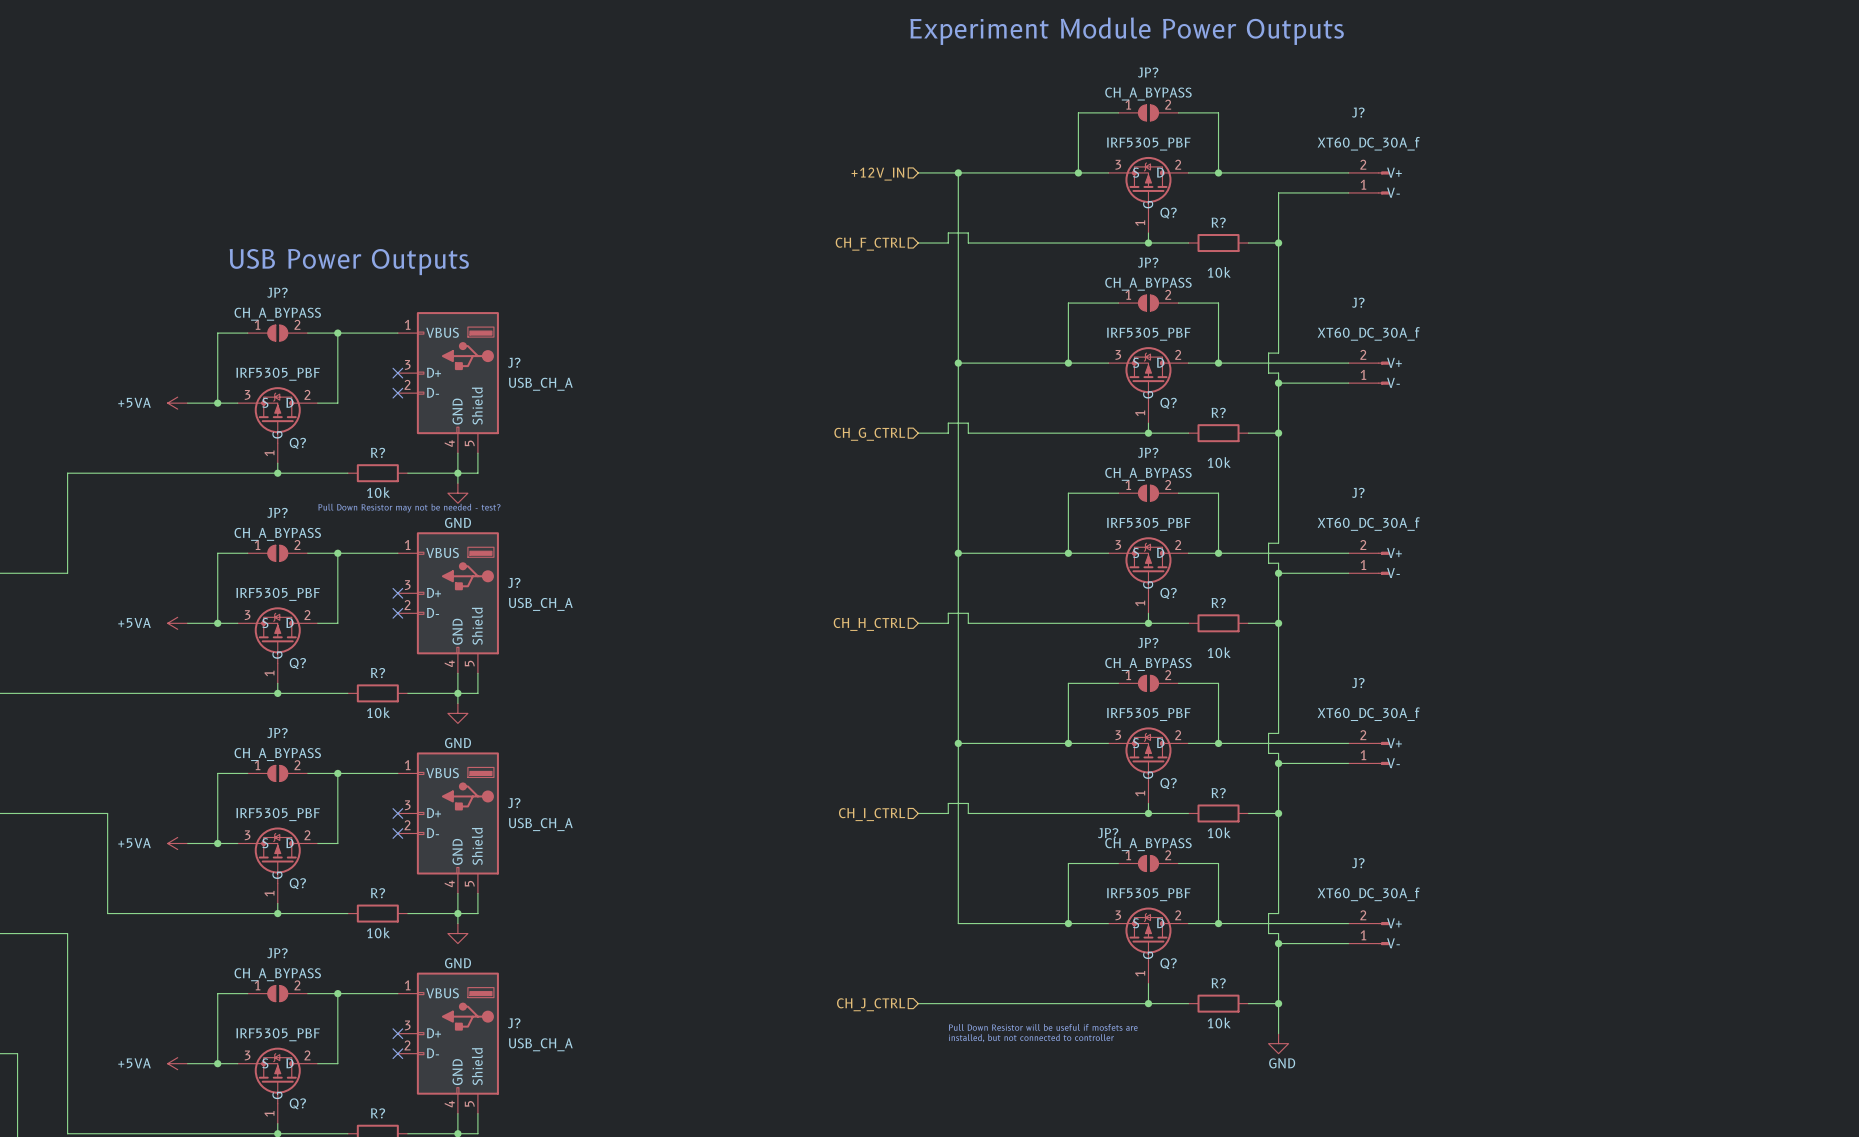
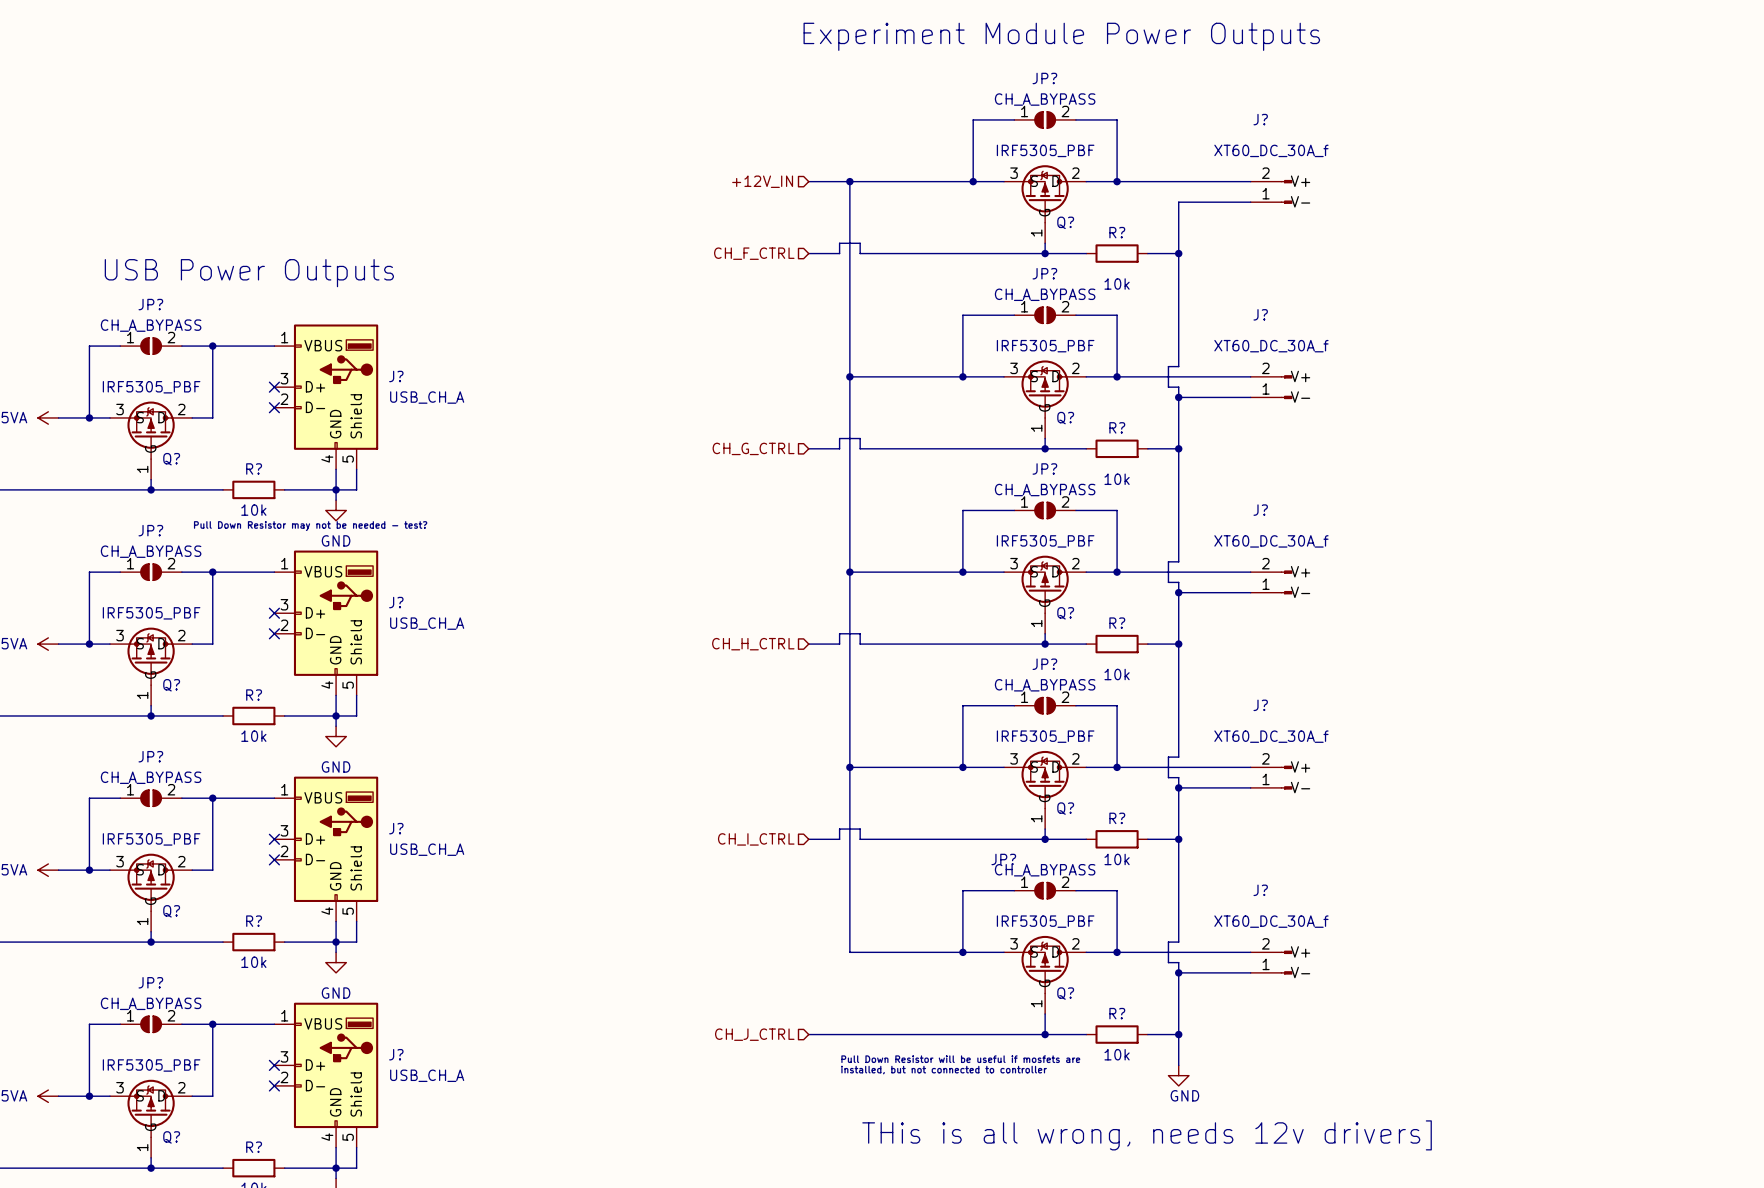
text: none -> THis is all wrong, needs 12v drivers] (1147, 1135)

